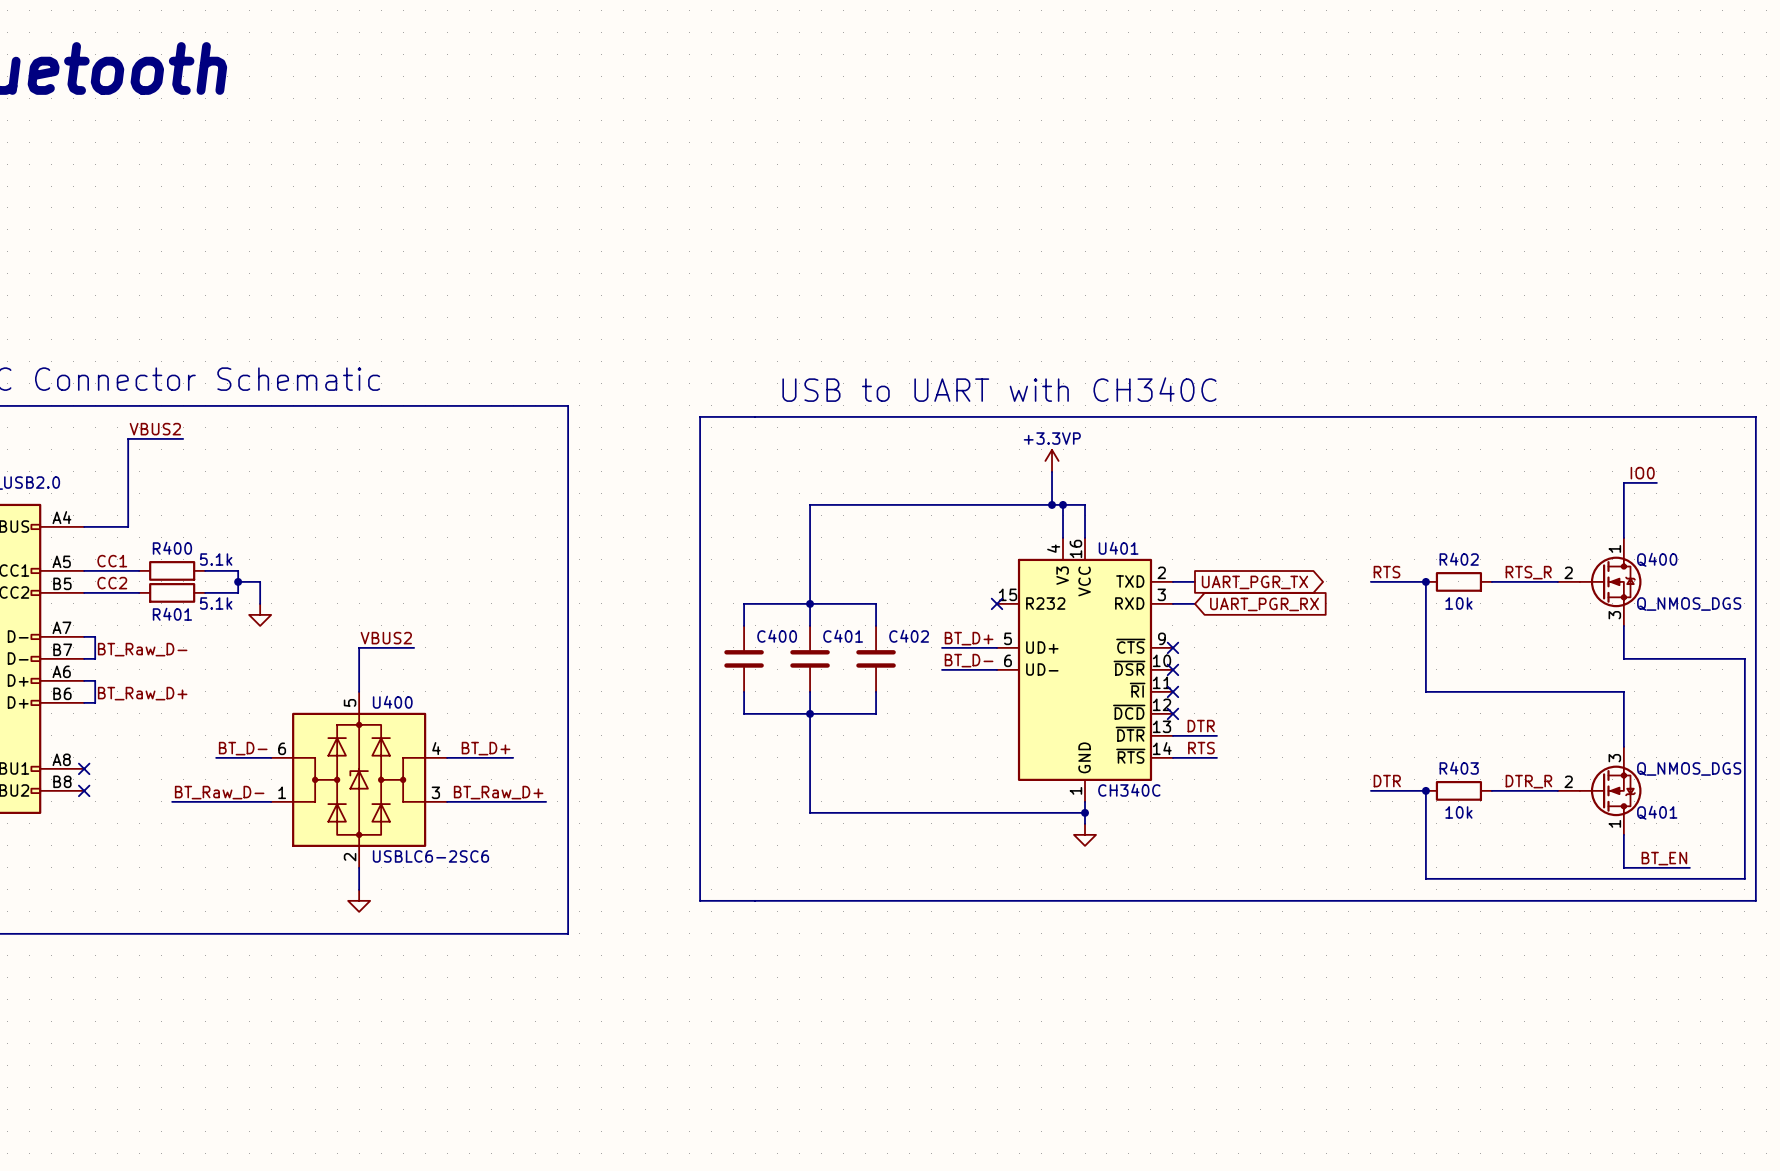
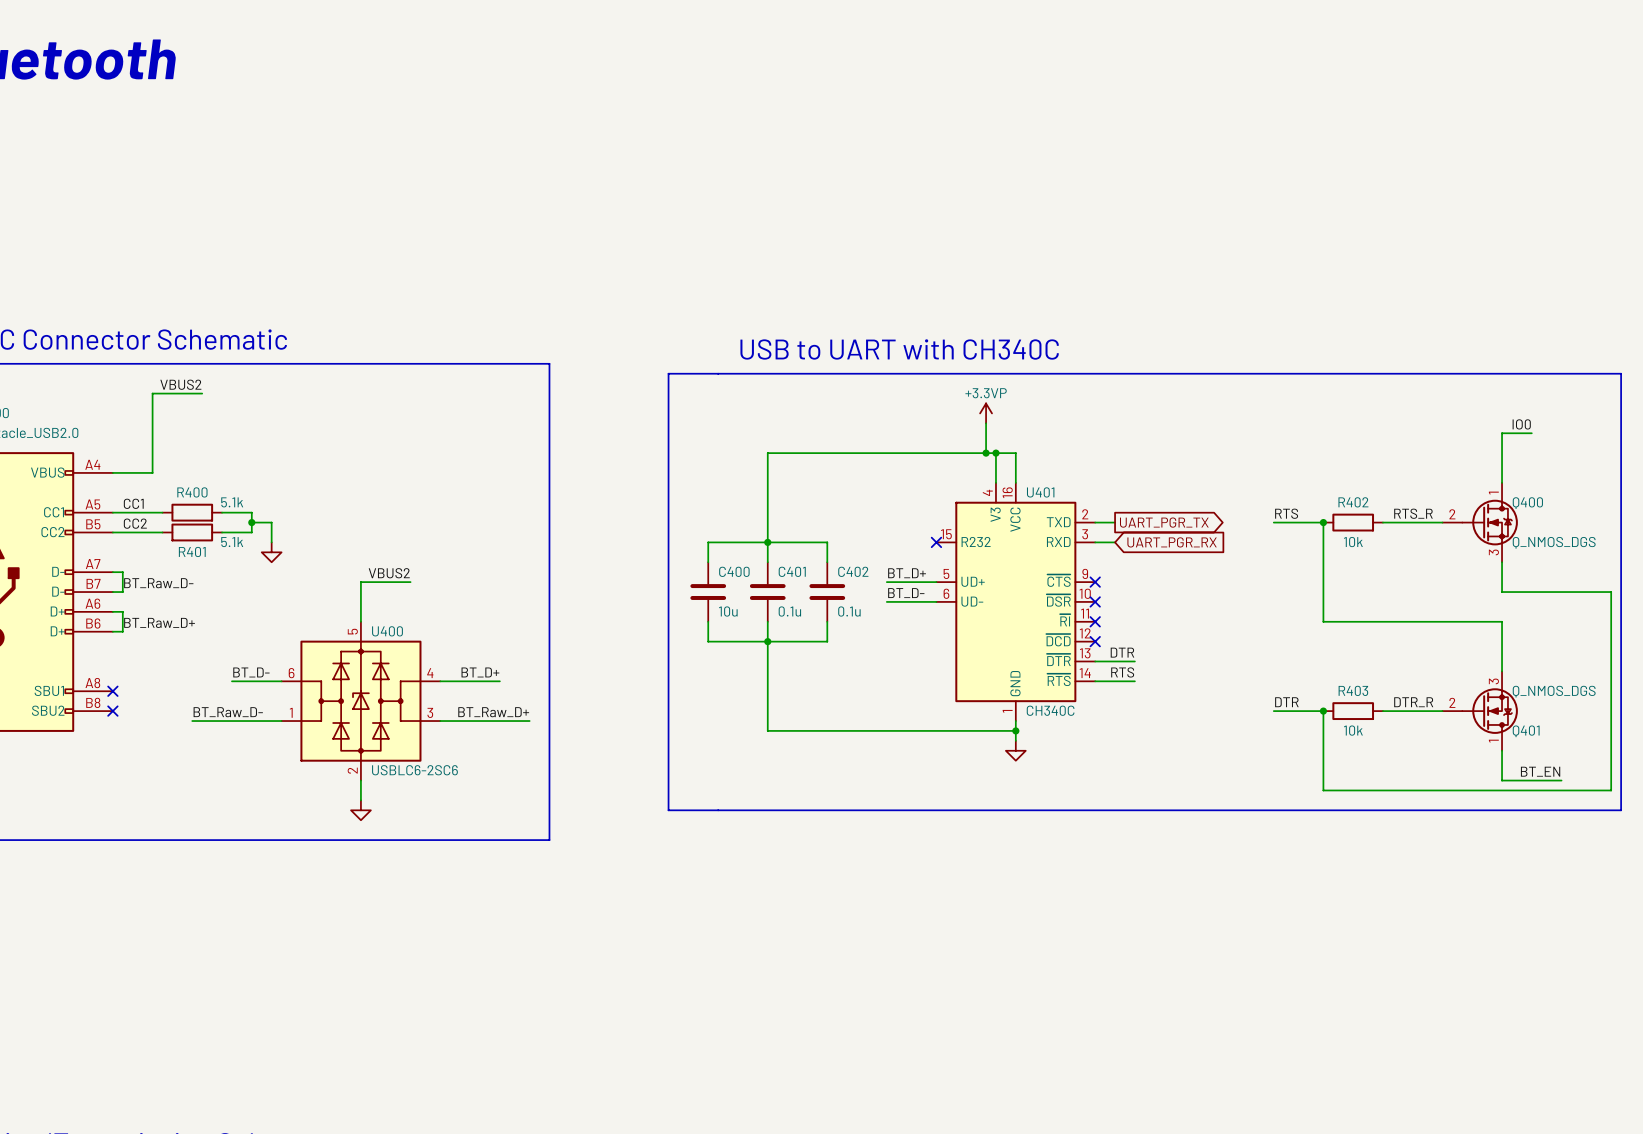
C400 value: none -> 10u (728, 611)
C401 value: none -> 0.1u (789, 611)
C402 value: none -> 0.1u (849, 611)

